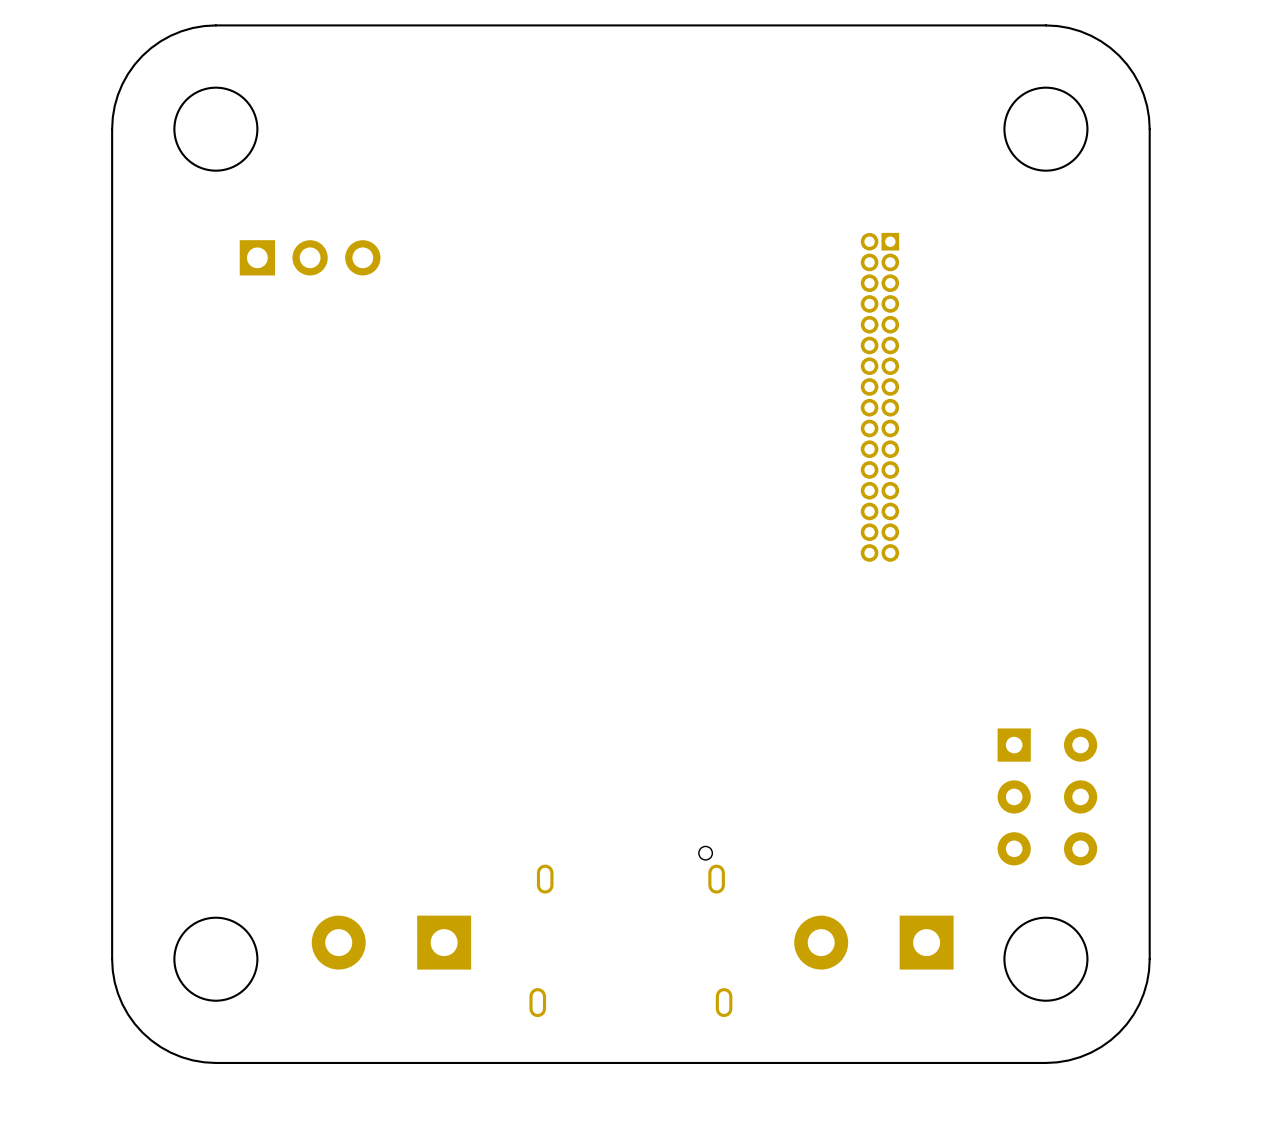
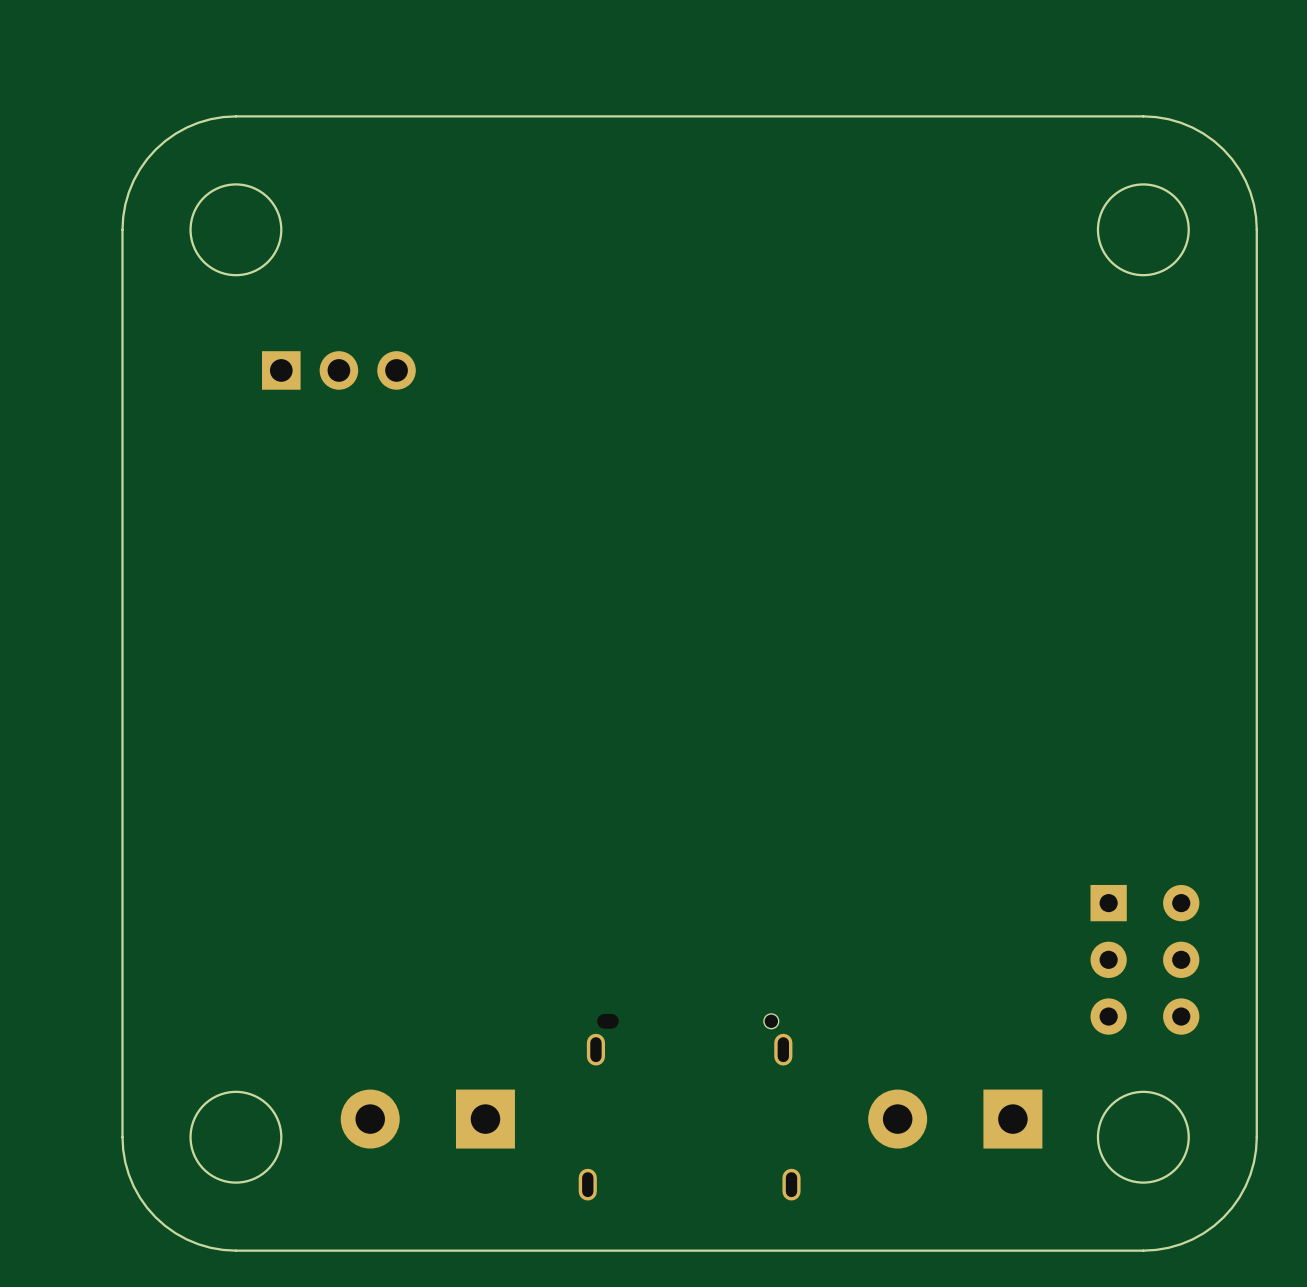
part: (879, 397) -> none

